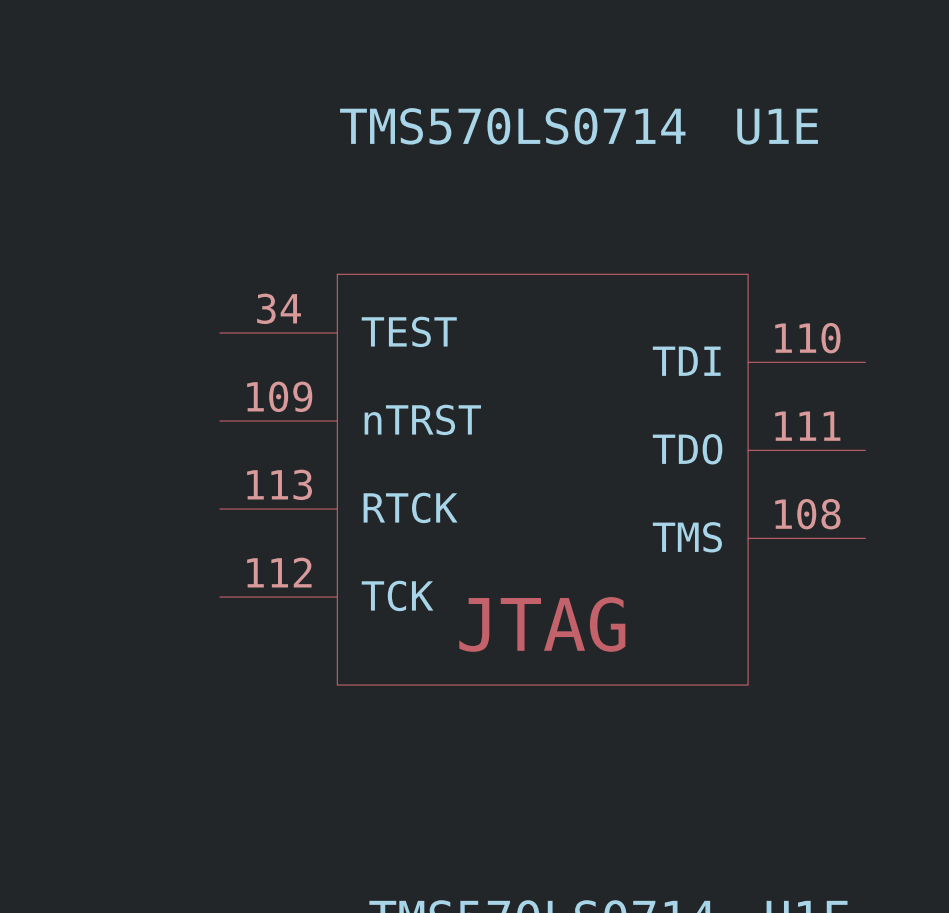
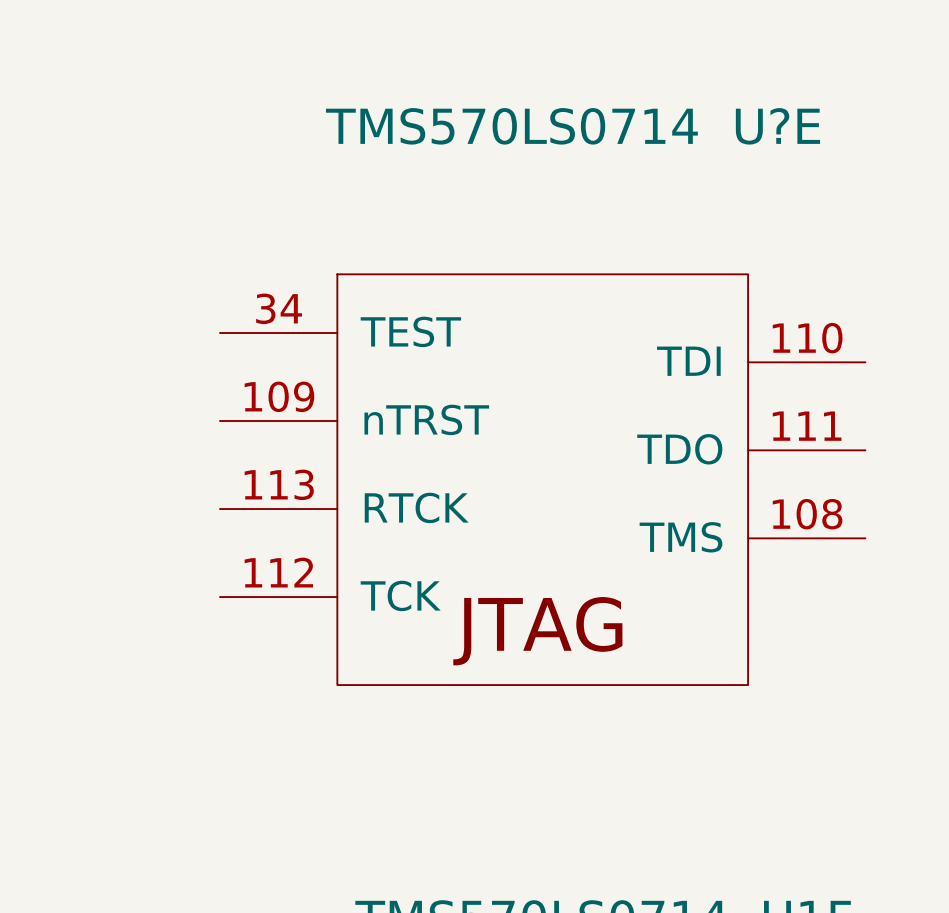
U1E name: U1E (777, 126) -> U?E (777, 126)

